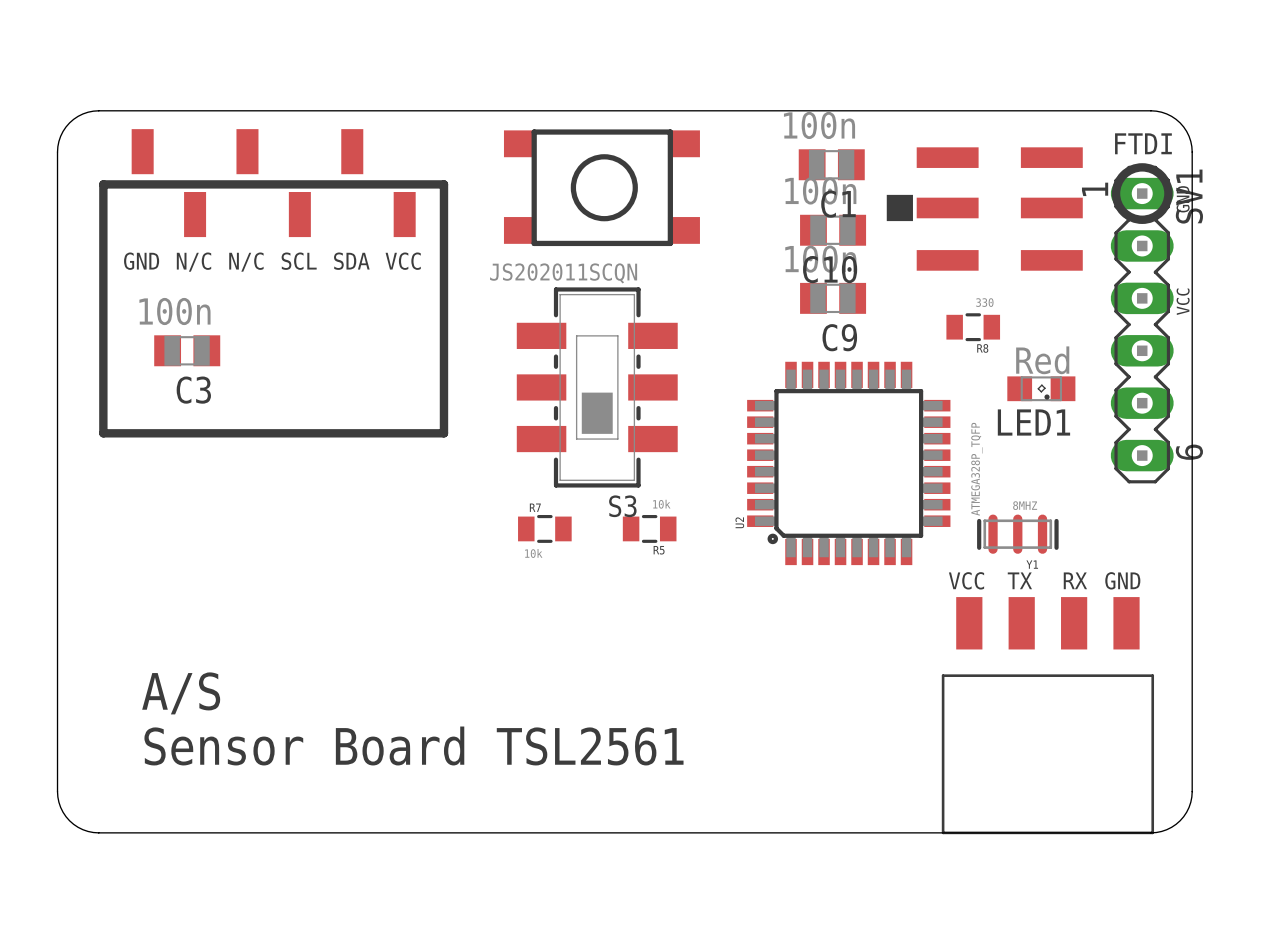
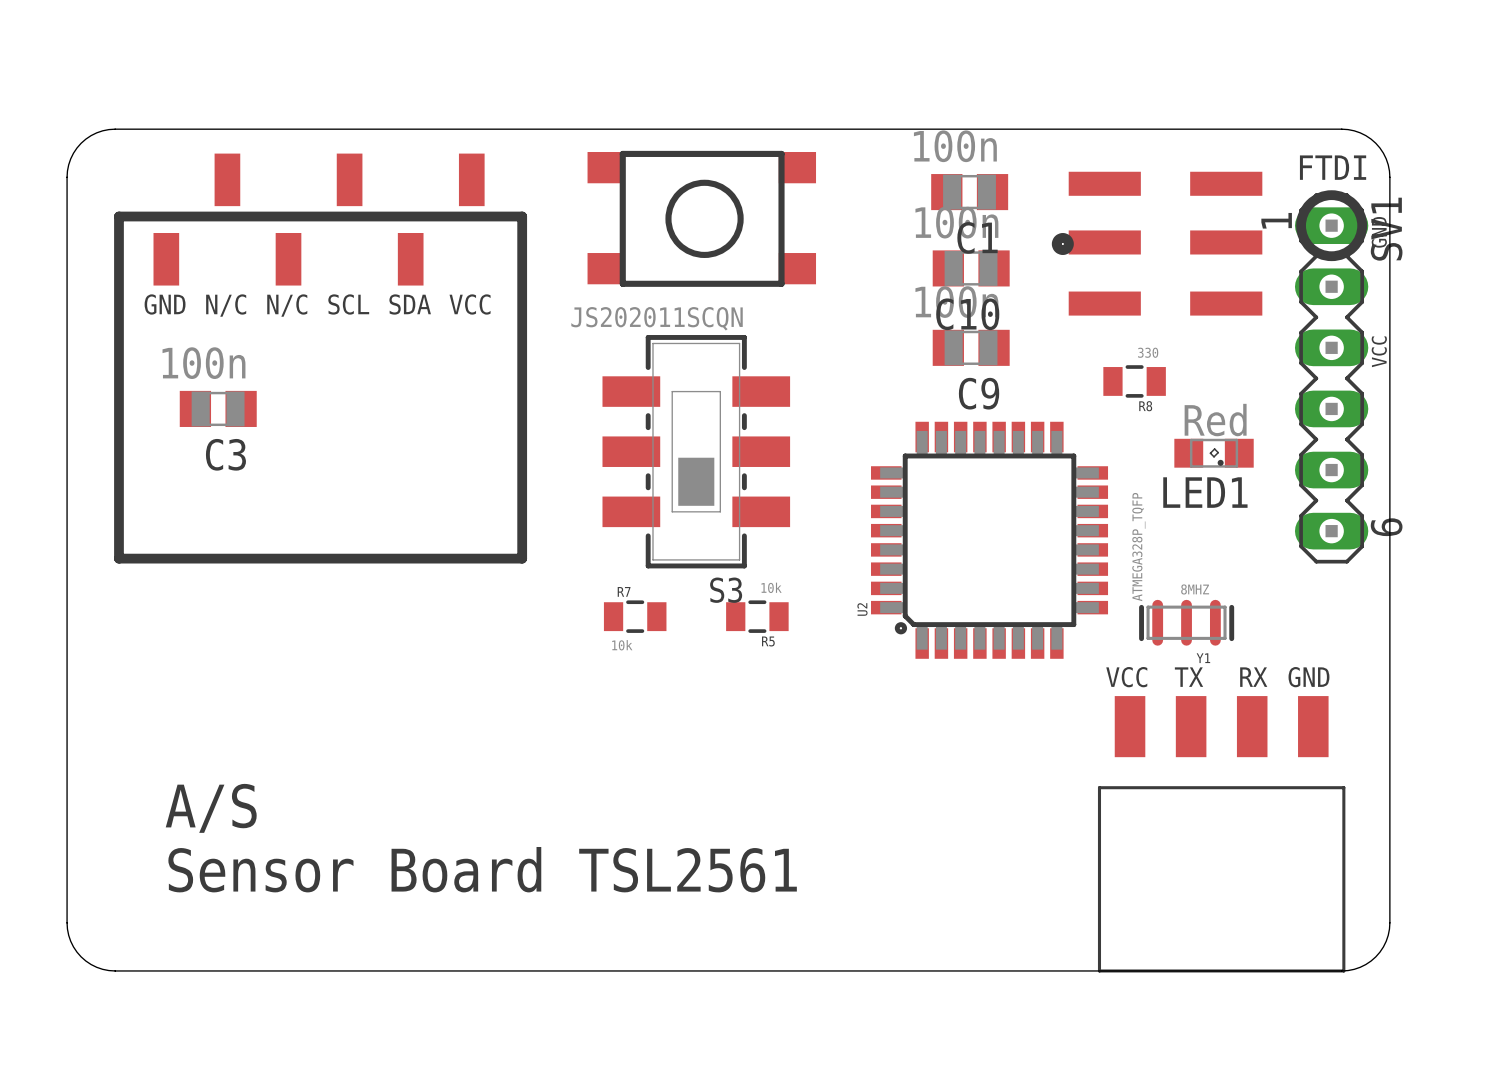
part footprint: [131, 129, 416, 238] -> [153, 153, 485, 286]
line: (103, 184) (103, 433) (443, 433) (443, 184) (103, 184) -> (118, 216) (118, 558) (522, 558) (522, 216) (118, 216)
drawing shape: [886, 194, 913, 222] -> [1051, 233, 1074, 255]

